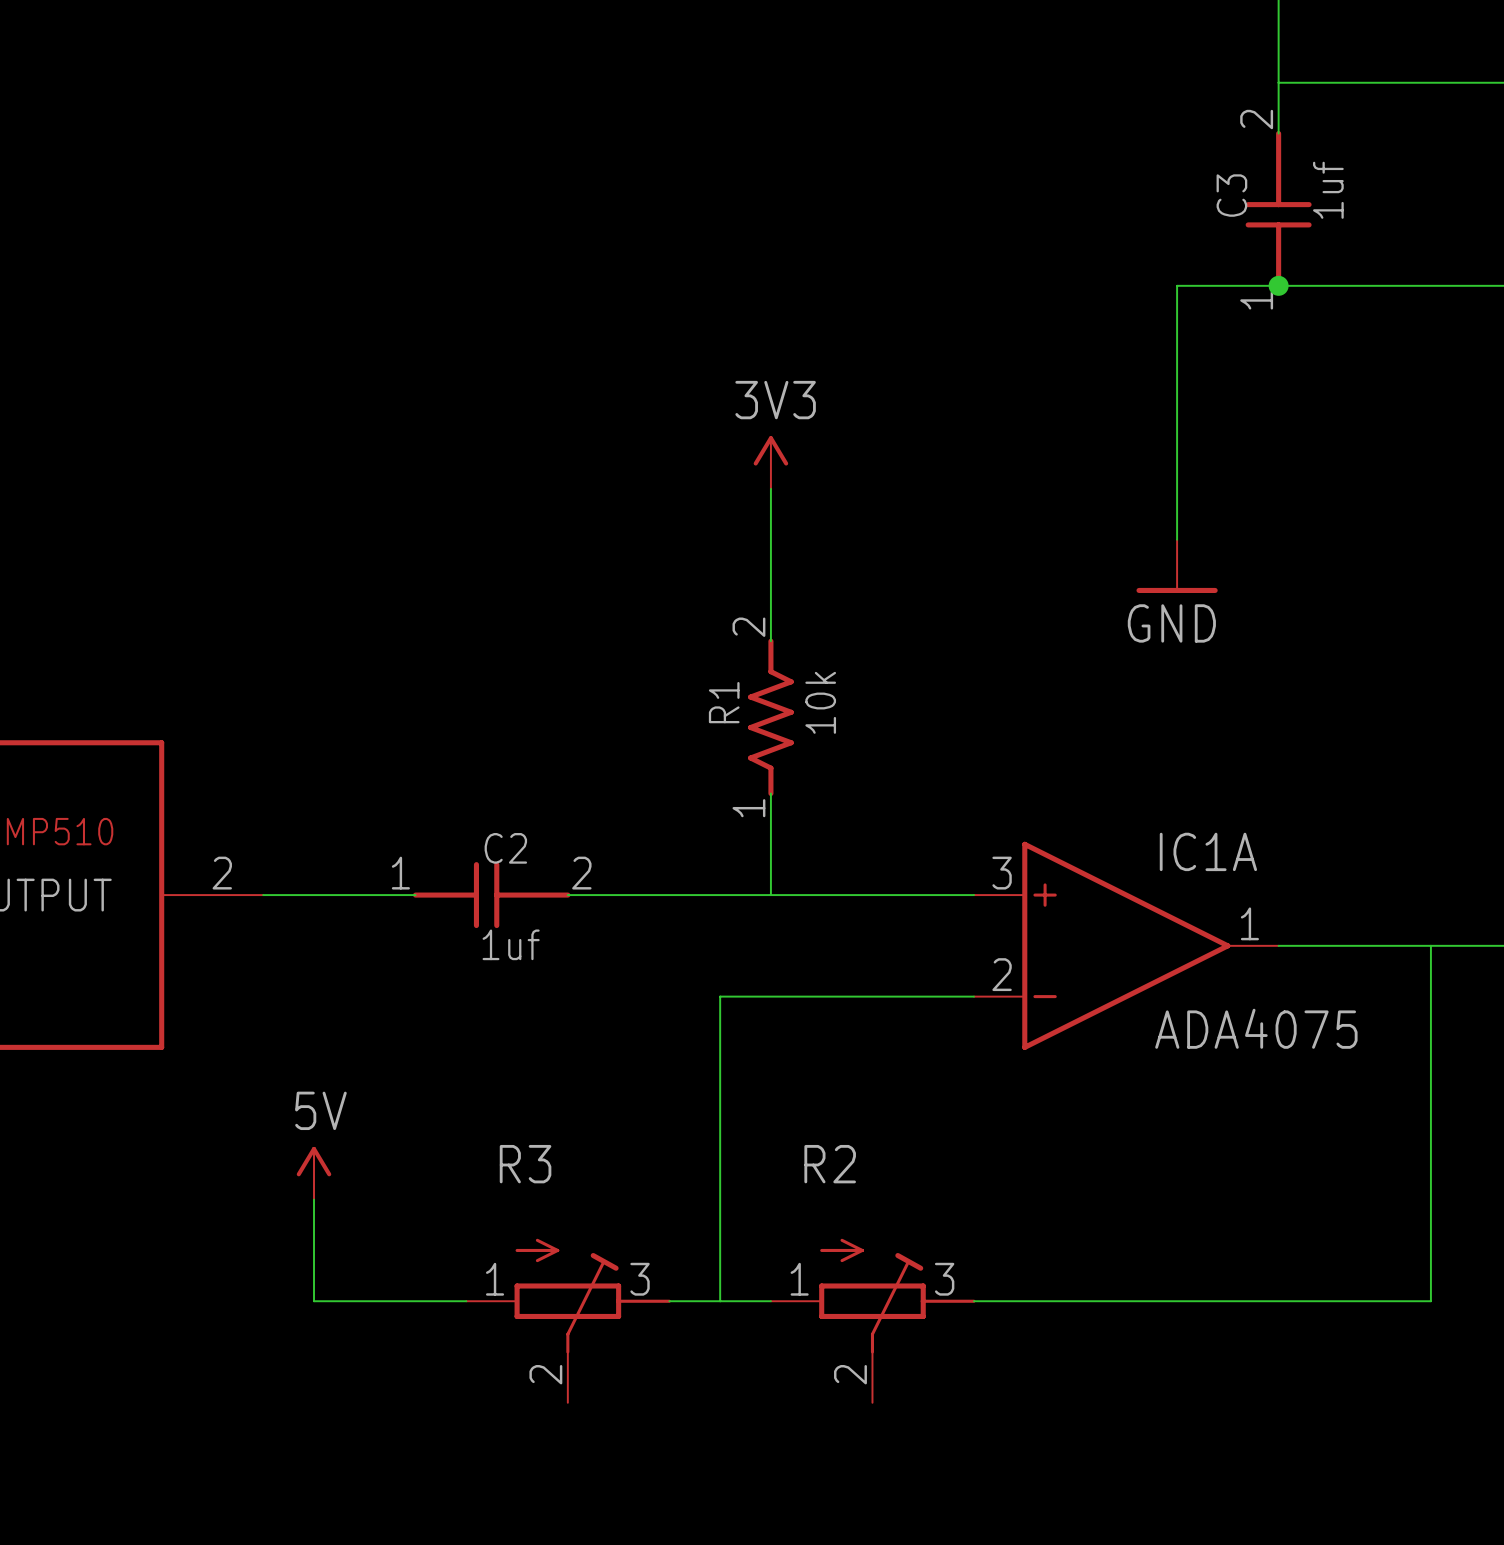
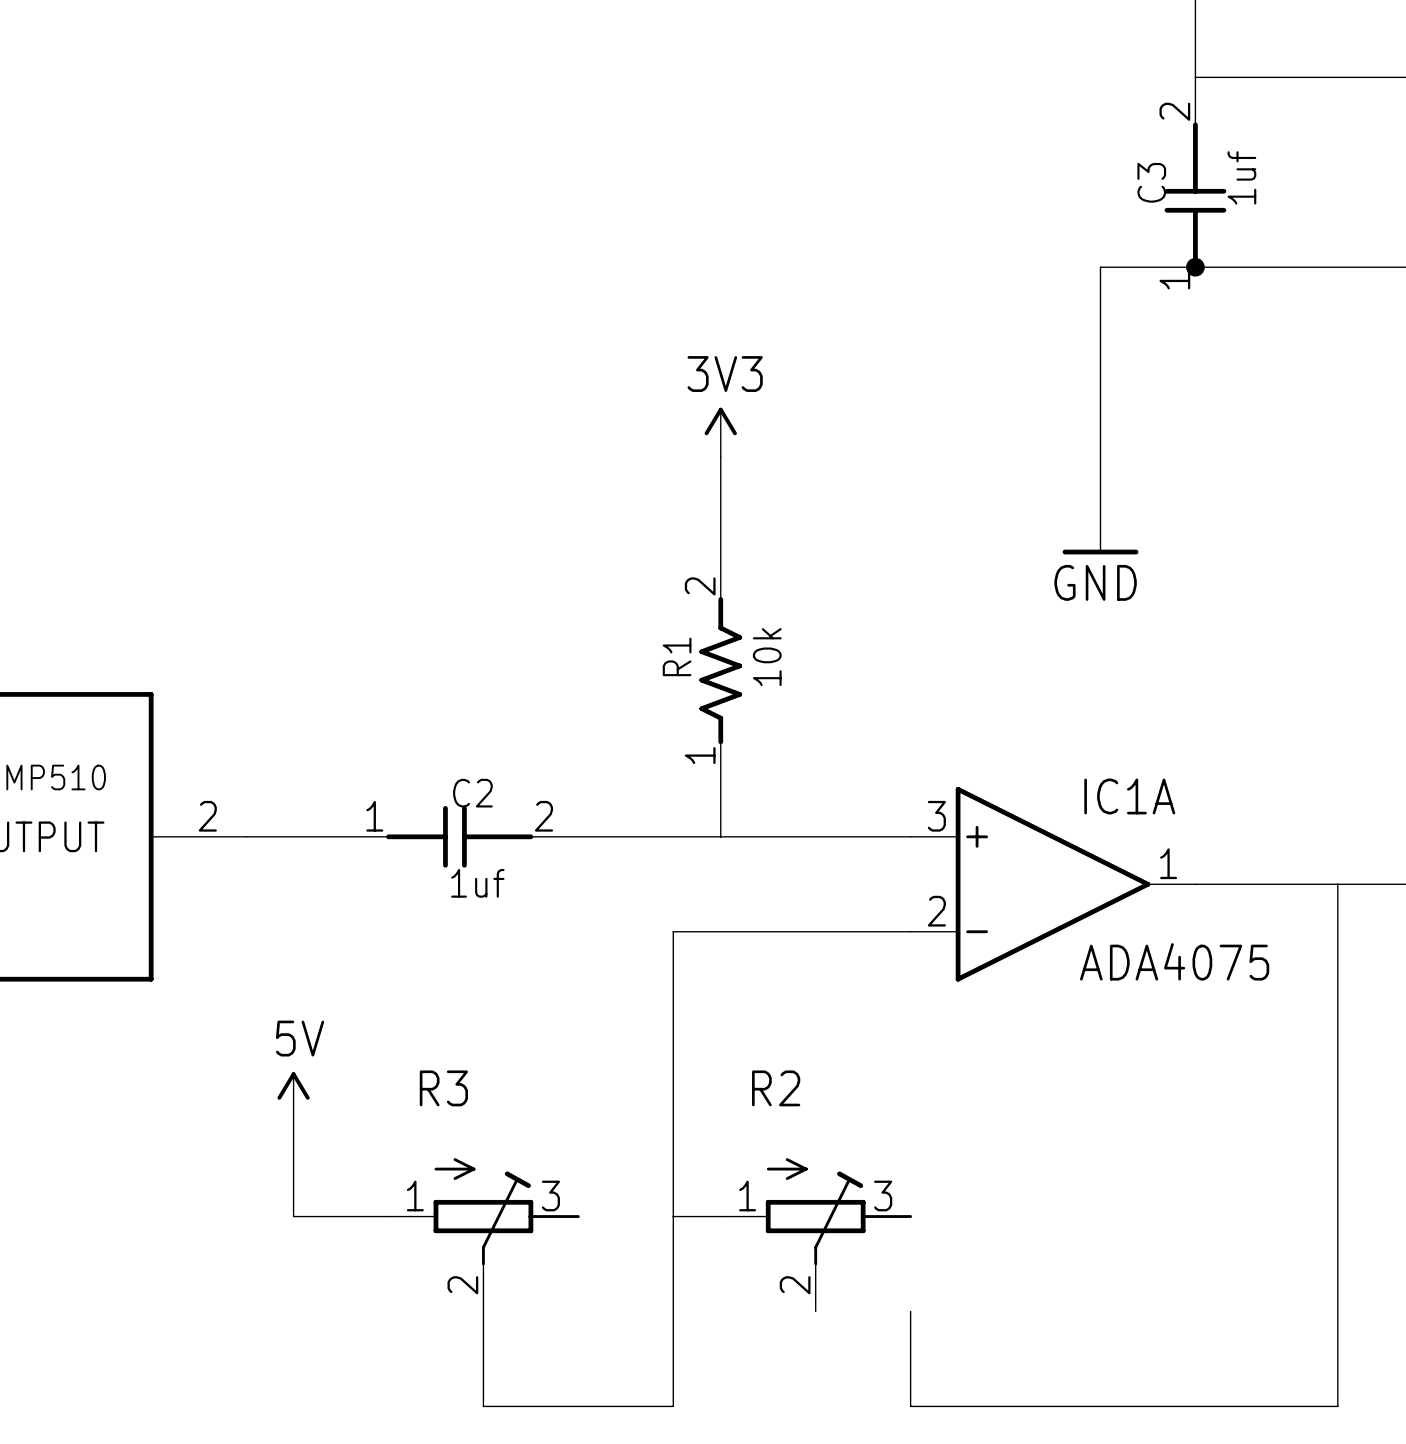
wire: (669, 1301) (720, 1301) -> (483, 1311) (483, 1406) (673, 1406) (673, 1216)
wire: (974, 1301) (1430, 1301) -> (910, 1311) (910, 1406) (1337, 1406) (1337, 1216)
R3 position: (568, 1320) -> (484, 1234)

